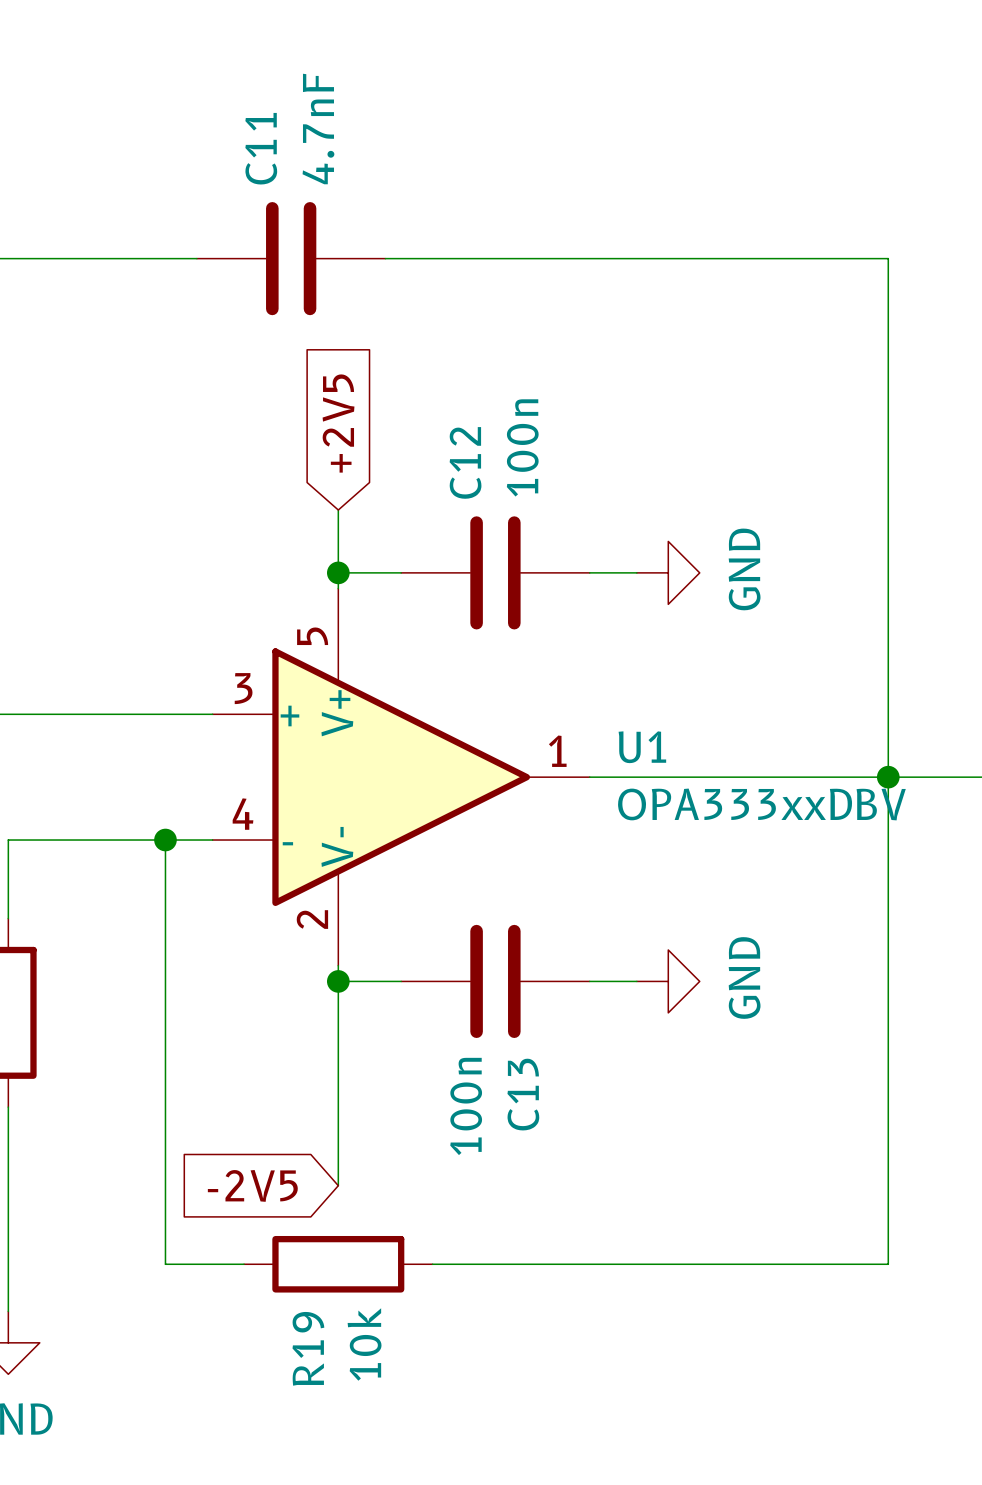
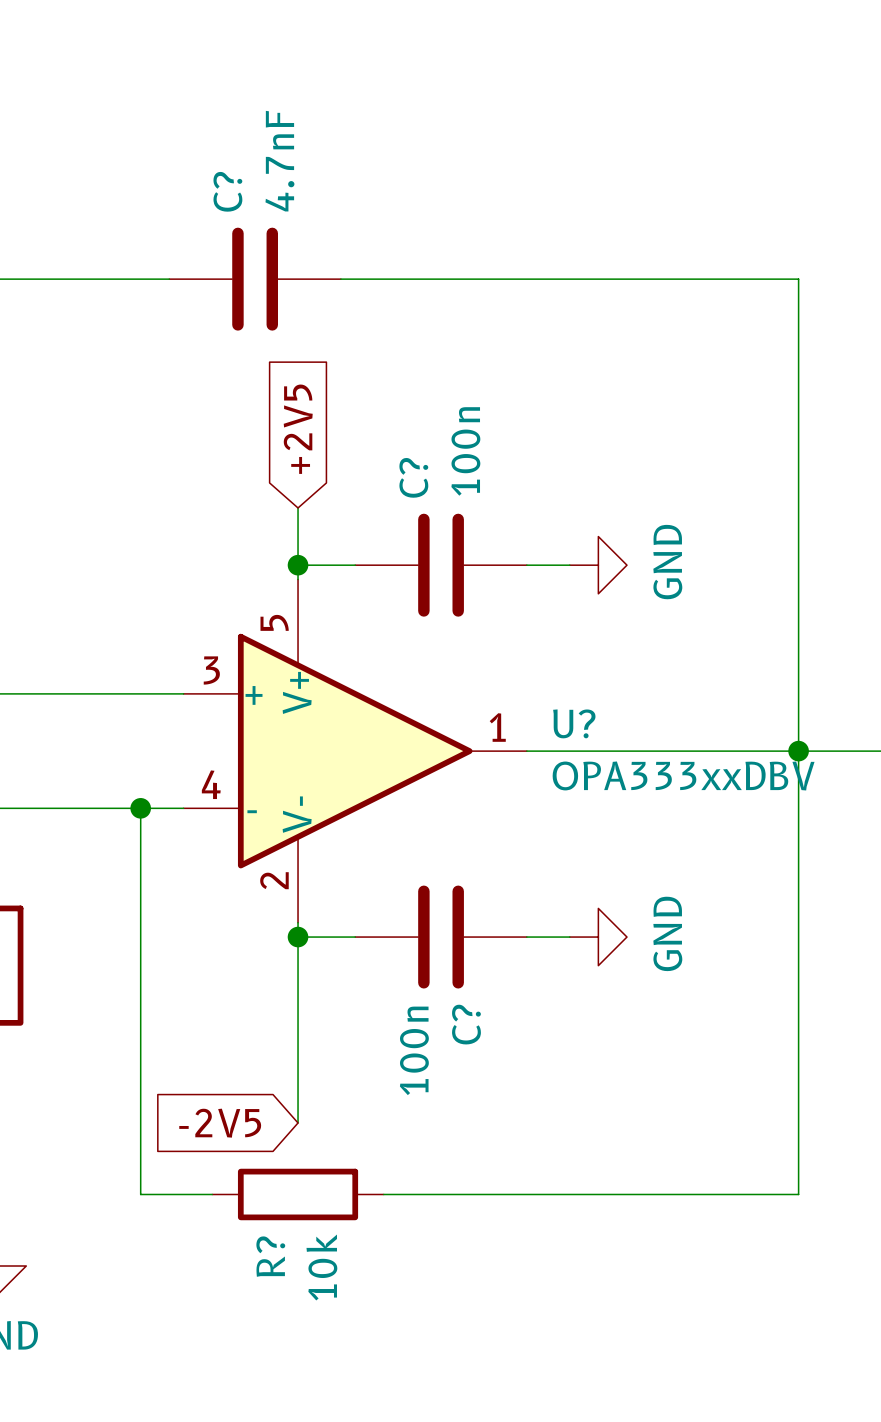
C11 name: C11 (261, 148) -> C? (227, 191)
C12 name: C12 (465, 462) -> C? (413, 477)
U1 name: U1 (642, 747) -> U? (574, 723)
C13 name: C13 (523, 1094) -> C? (466, 1024)
R19 name: R19 (308, 1348) -> R? (270, 1256)

